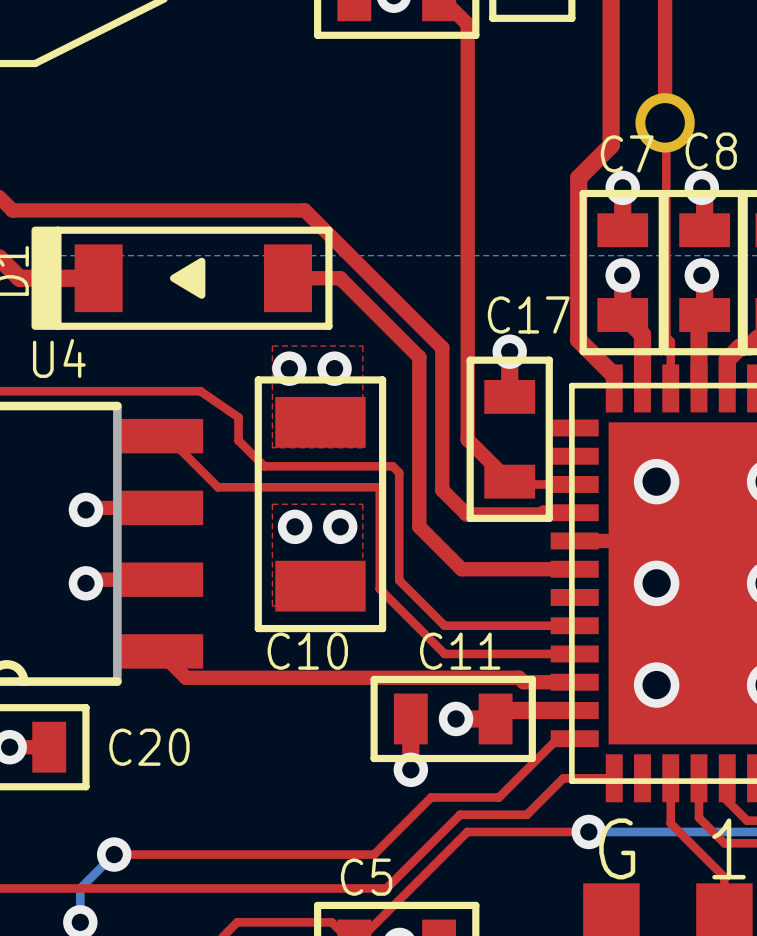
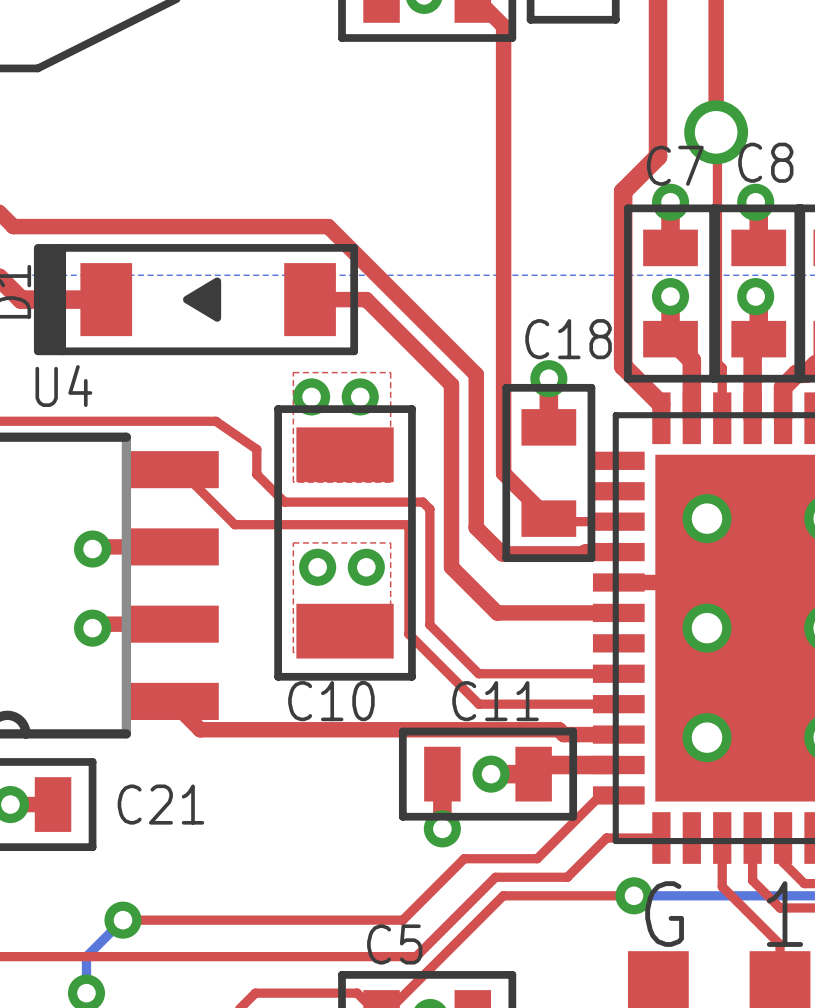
C17 name: C17 (528, 314) -> C18 (568, 339)
C20 name: C20 (149, 747) -> C21 (160, 804)

